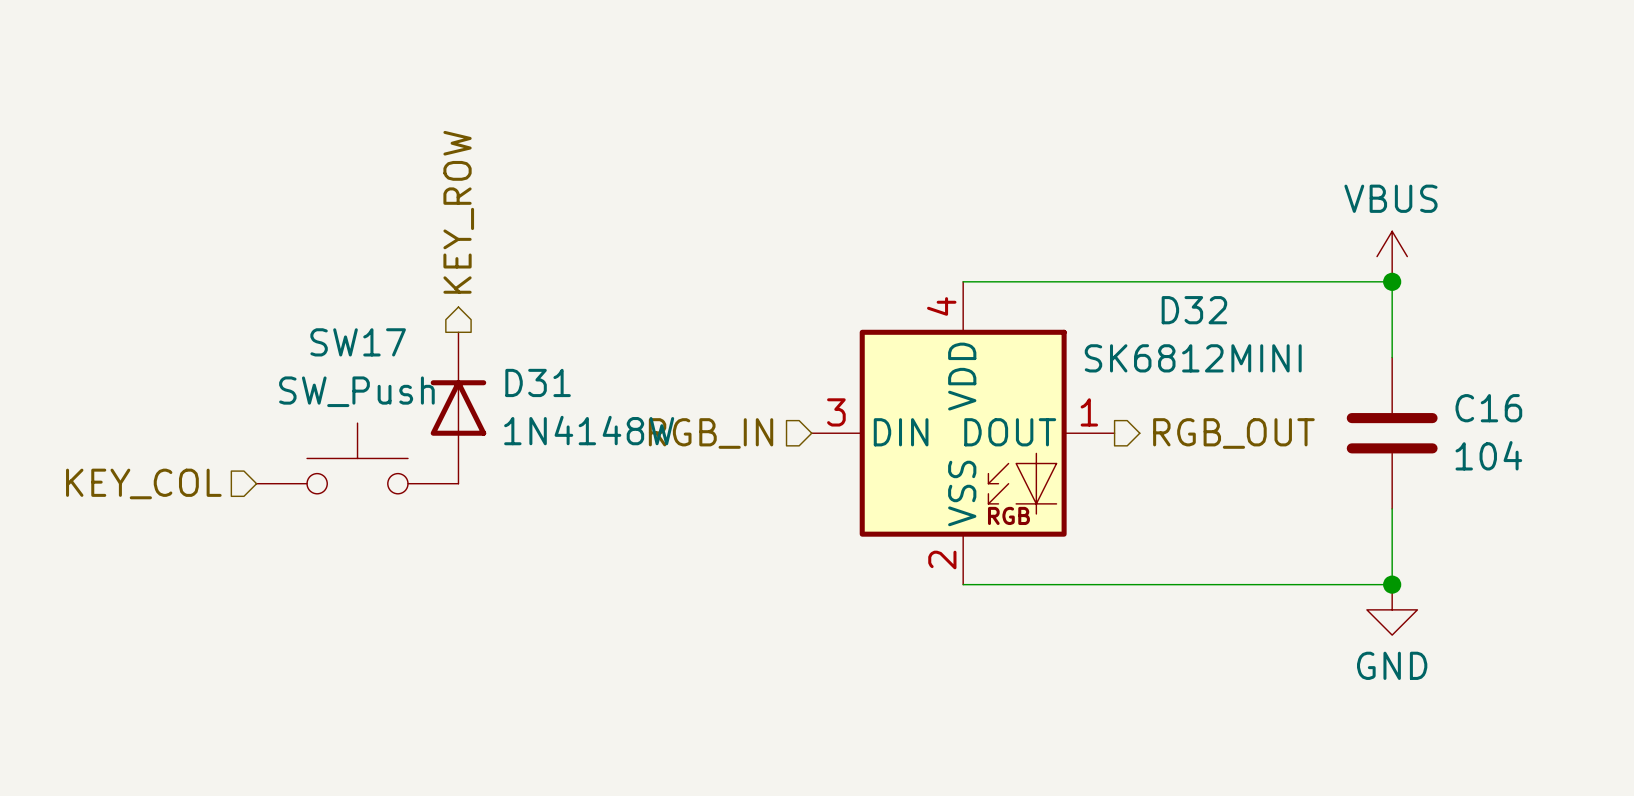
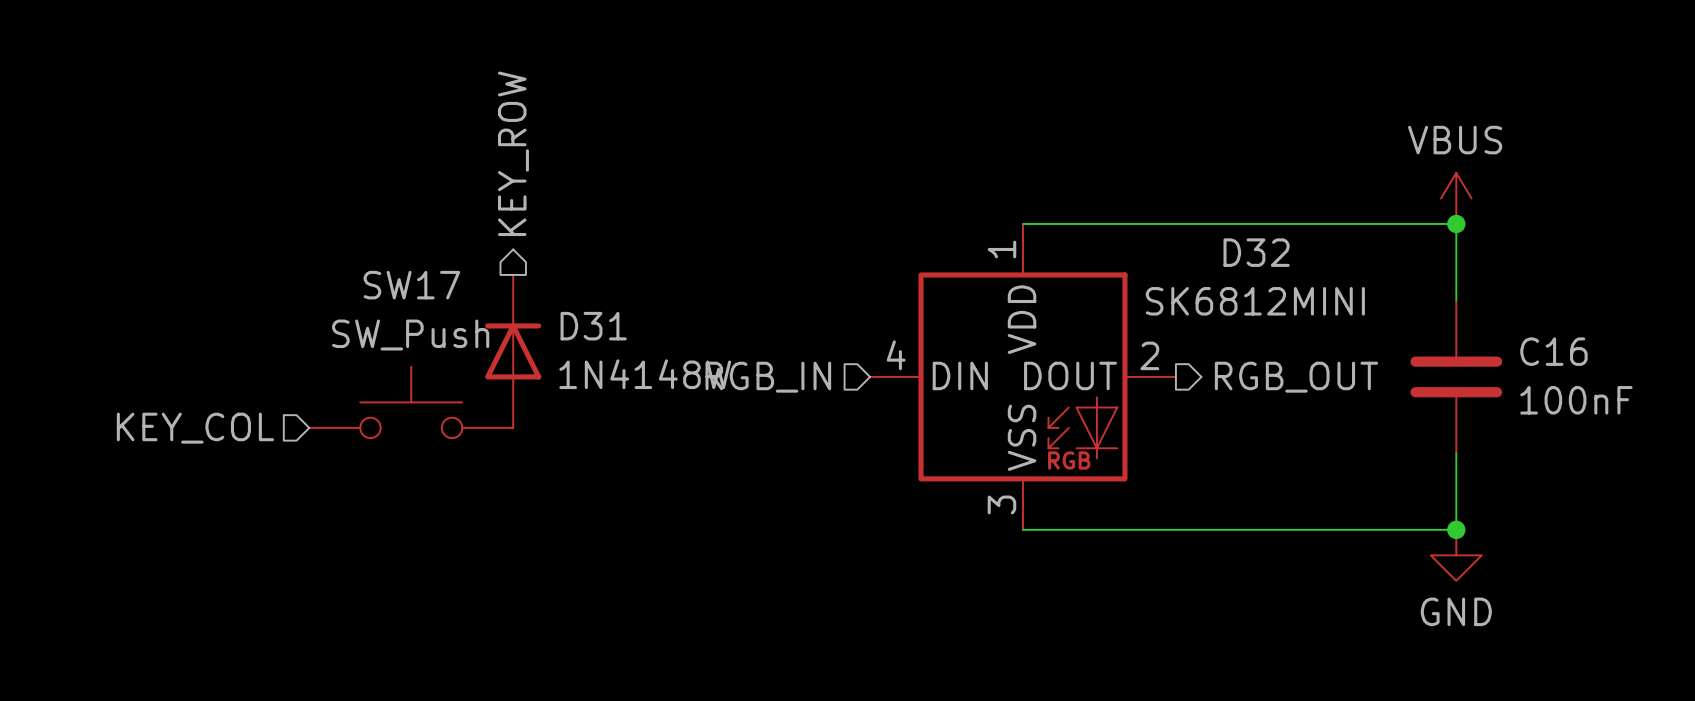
D32 pin number: 4 (941, 306) -> 1 (1001, 249)
D32 pin number: 3 (836, 412) -> 4 (896, 355)
D32 pin number: 1 (1089, 412) -> 2 (1149, 355)
C16 value: 104 (1488, 455) -> 100nF (1576, 400)
D32 pin number: 2 (942, 560) -> 3 (1001, 504)

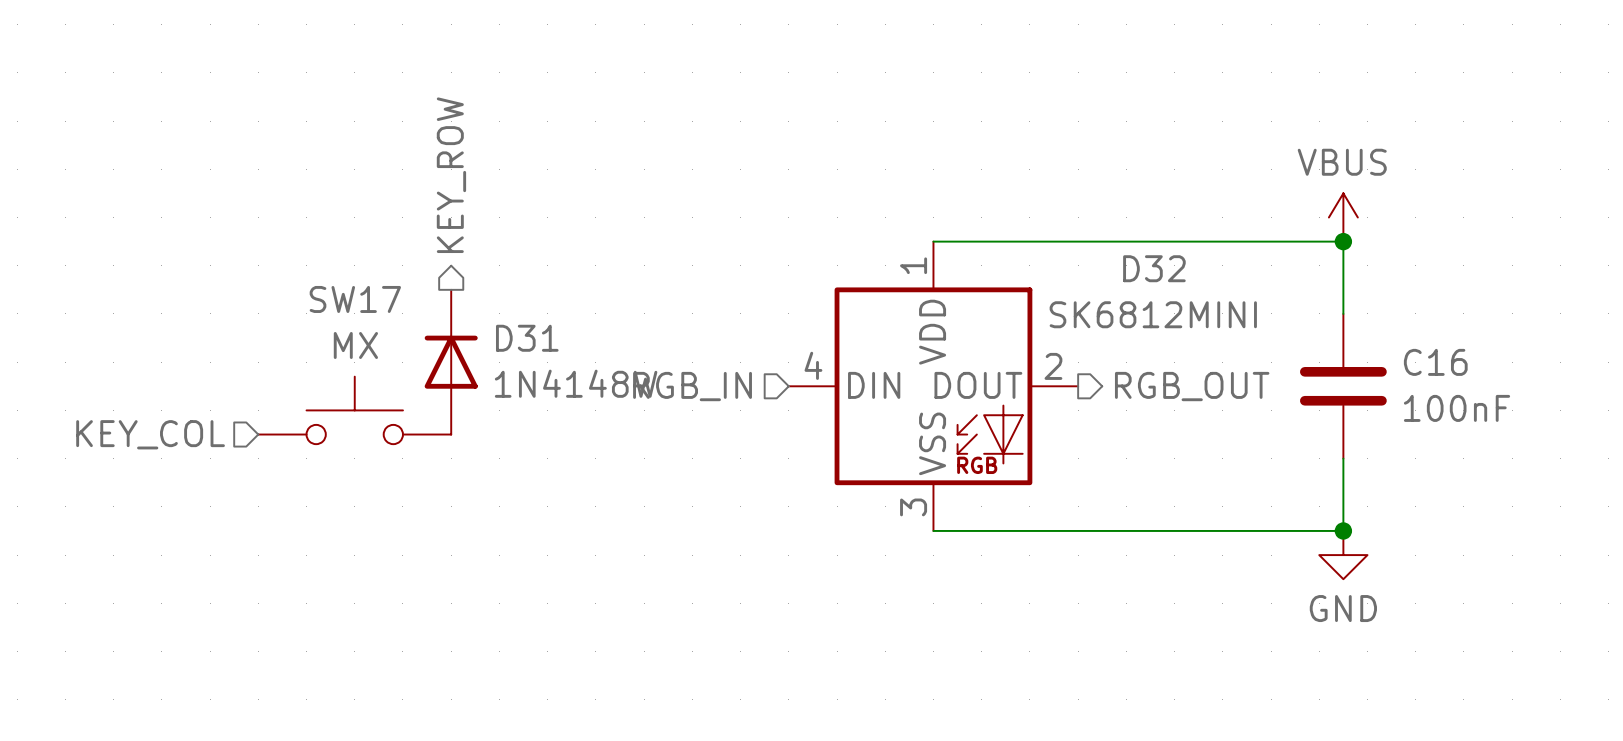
SW17 value: SW_Push (410, 335) -> MX (355, 345)

